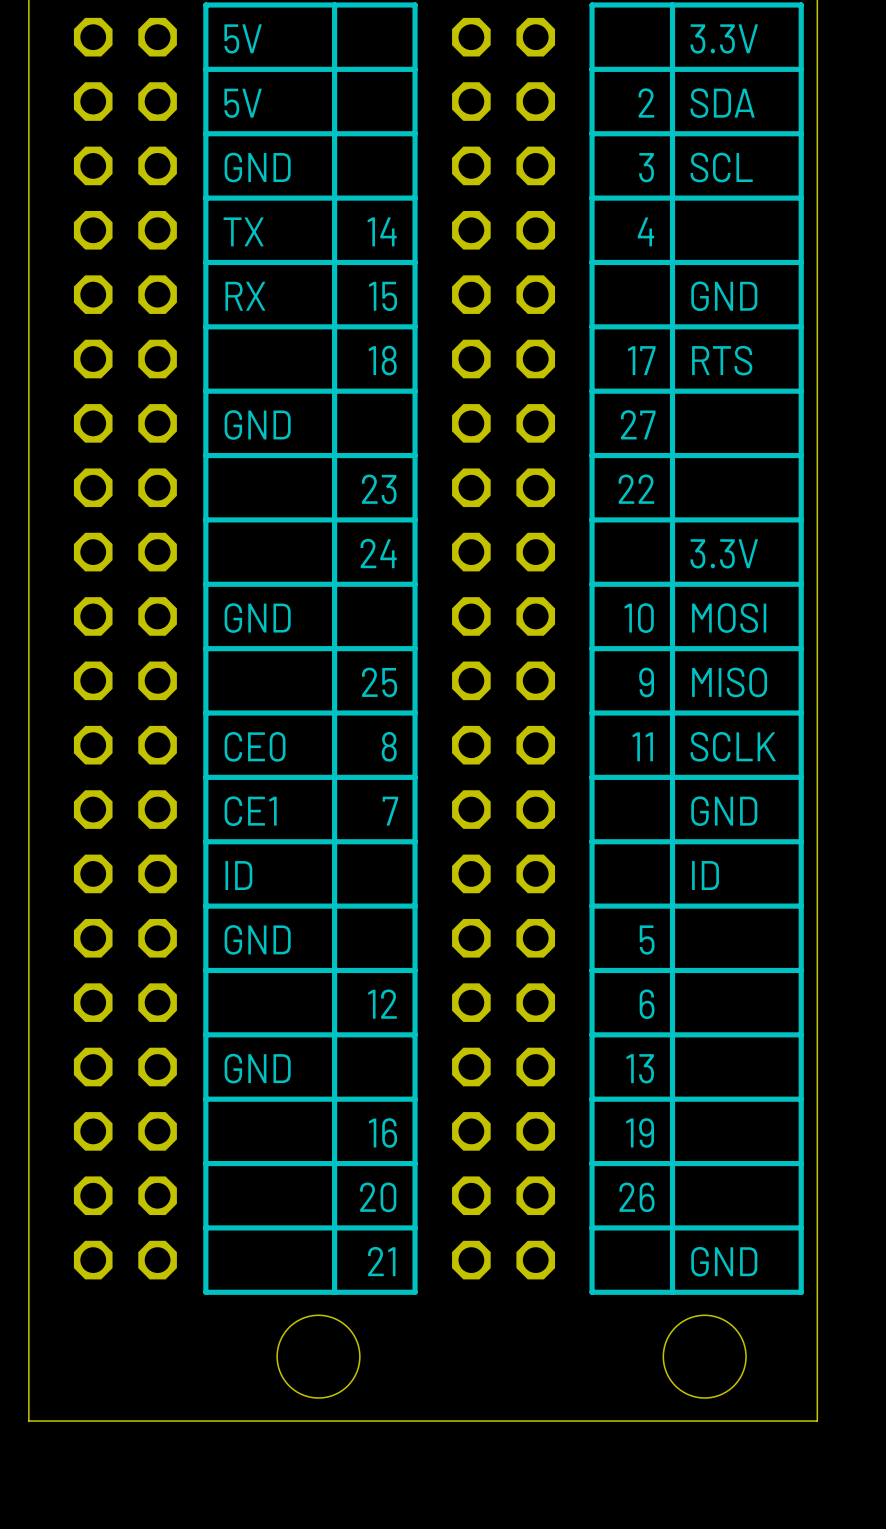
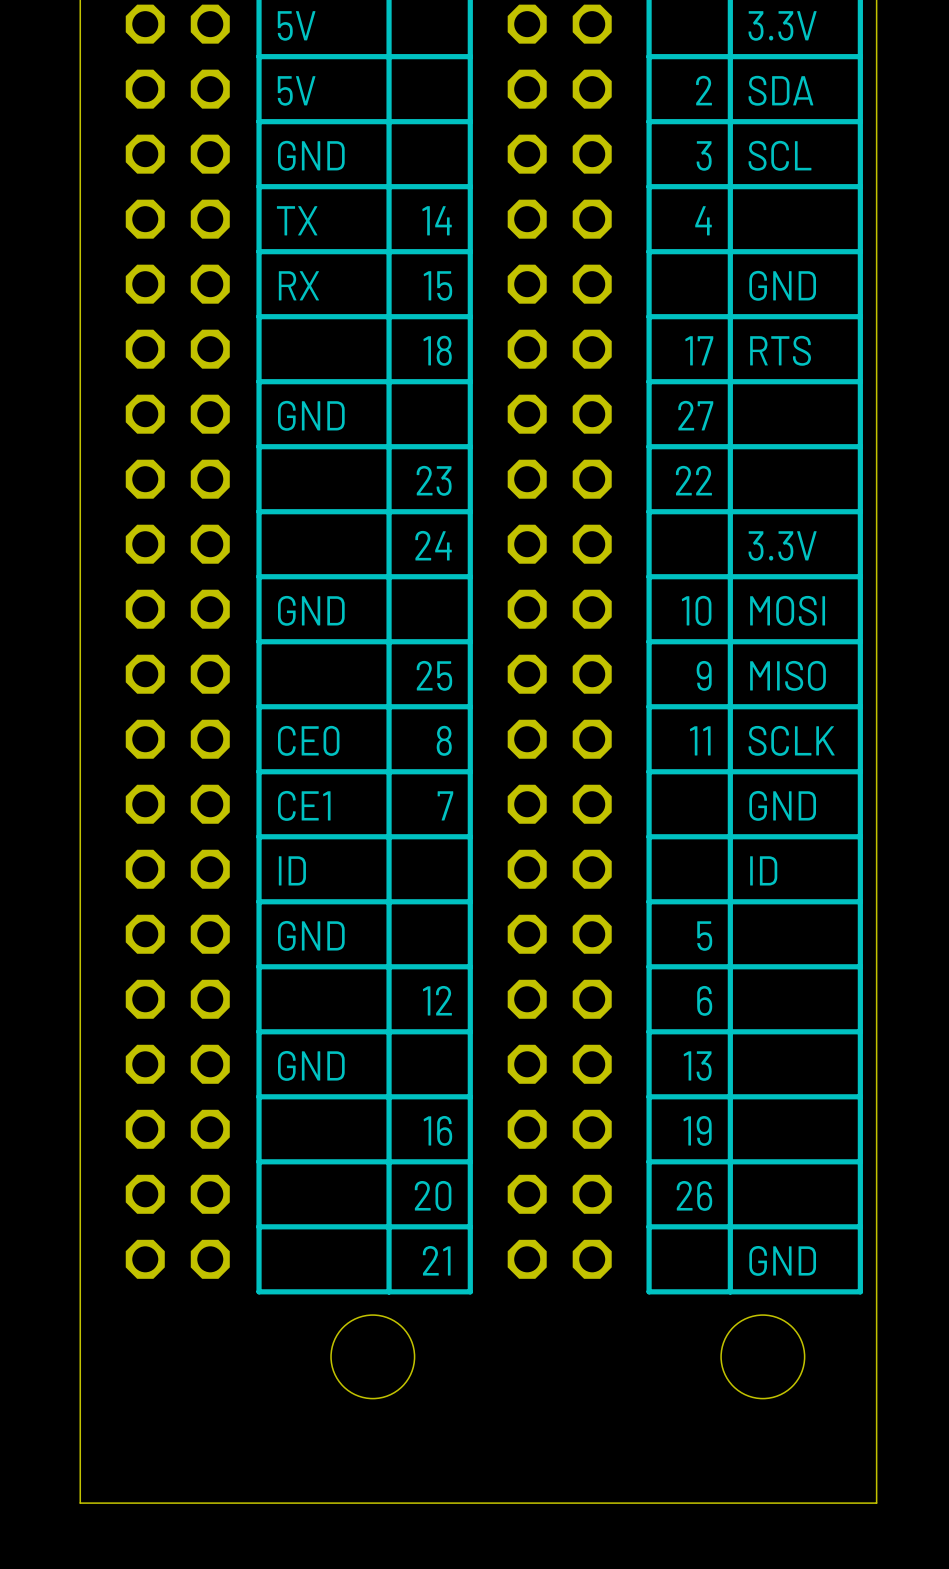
board edge: (28, 1421) (817, 1421) -> (80, 1421) (80, 1503) (876, 1503) (876, 1421)

